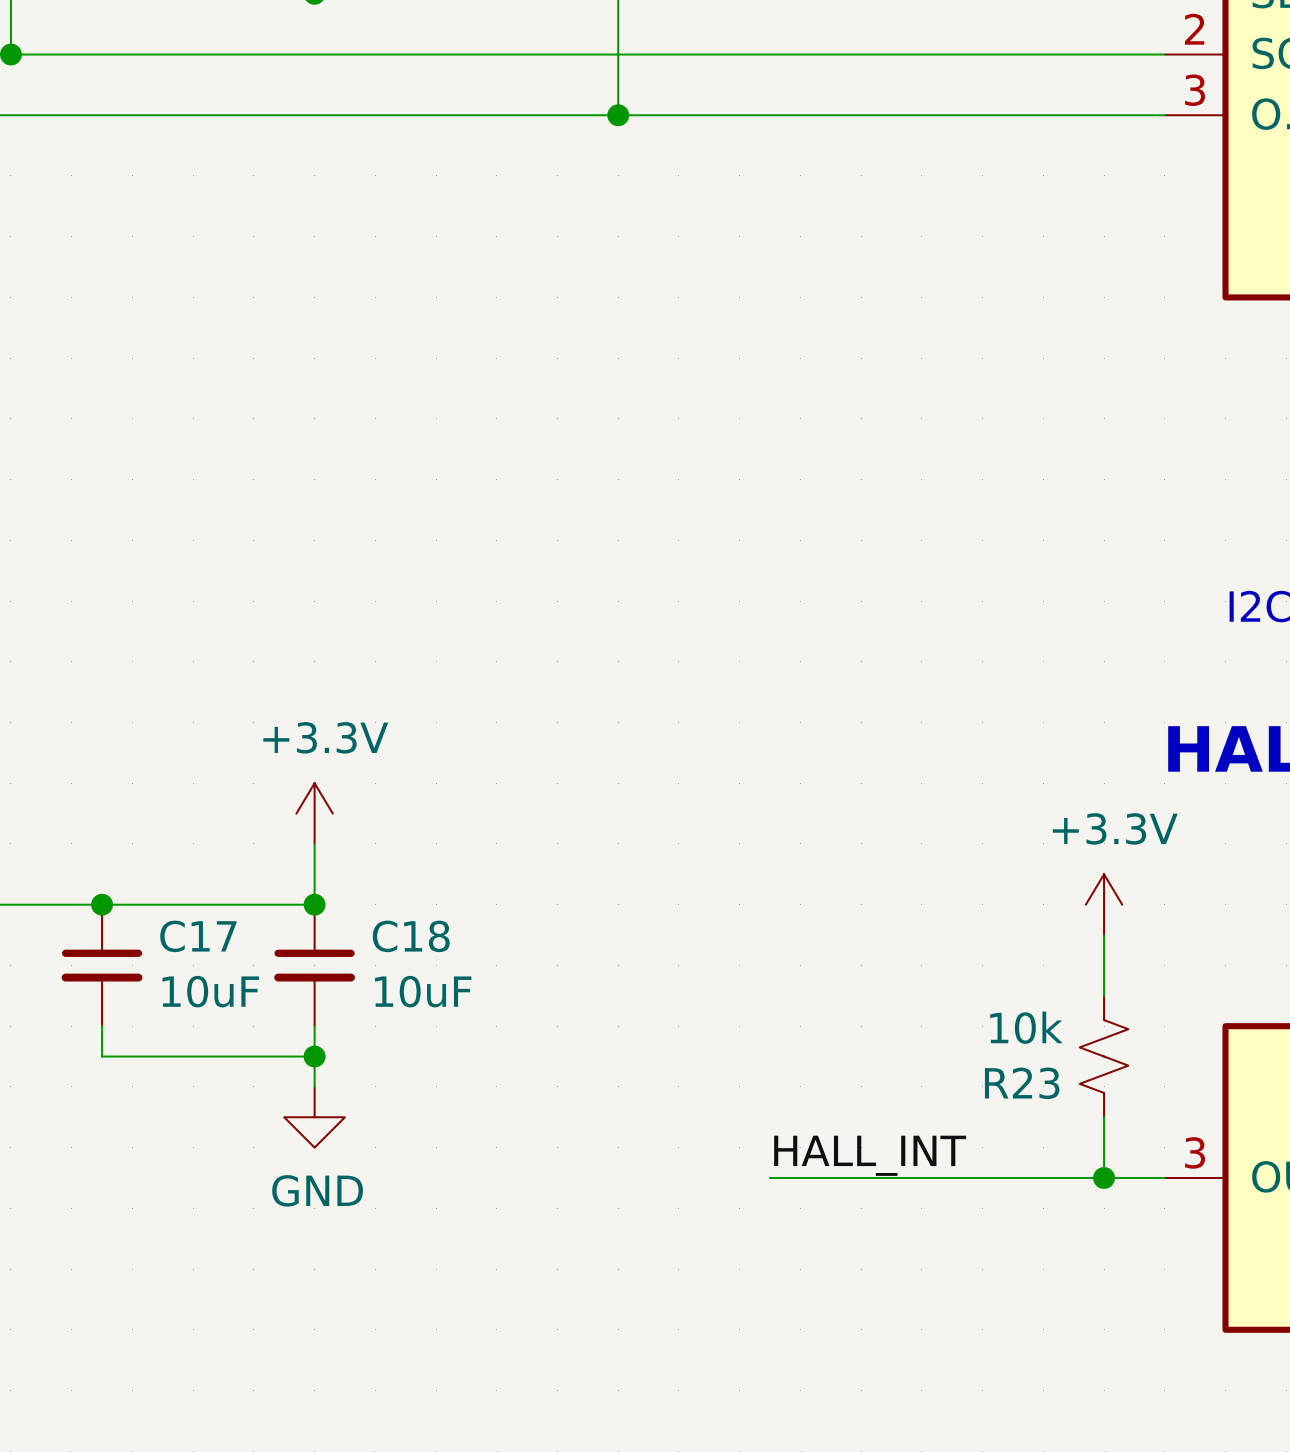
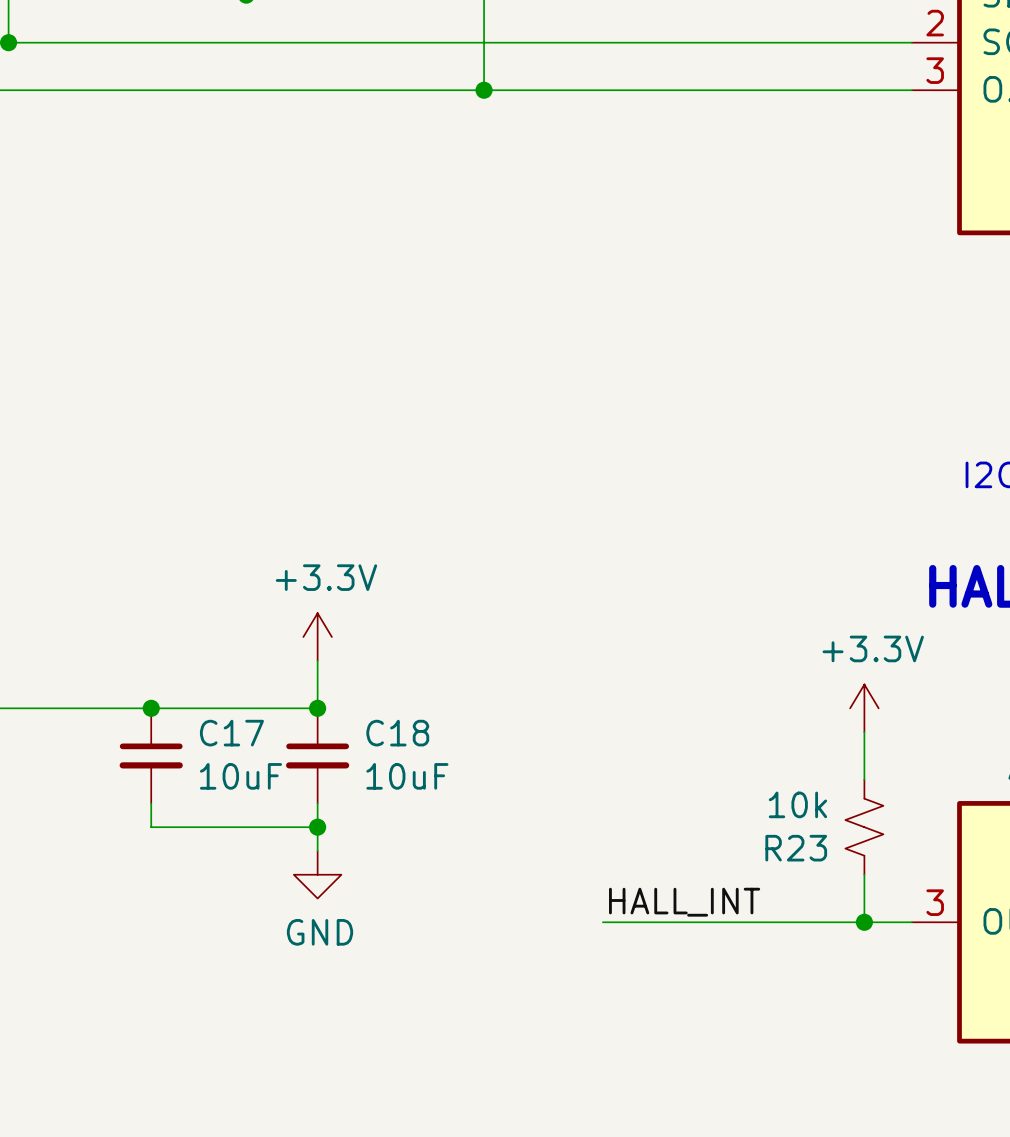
power symbol position: +3.3V (314, 813) -> +3.3V (317, 637)
wire: (314, 843) (314, 904) -> (317, 660) (317, 708) (246, 708)
junction: (102, 904) -> none
junction: none -> (151, 708)
junction: (314, 904) -> none
junction: none -> (317, 708)
C17 position: (102, 965) -> (151, 755)
C18 position: (314, 965) -> (317, 755)
wire: (102, 1026) (102, 1056) (193, 1056) -> (151, 803) (151, 827)
wire: (314, 1026) (314, 1086) -> (317, 803) (317, 850)
wire: none -> (246, 827) (317, 827)
junction: (314, 1056) -> none
junction: none -> (317, 827)
power symbol position: GND (314, 1117) -> GND (317, 874)

